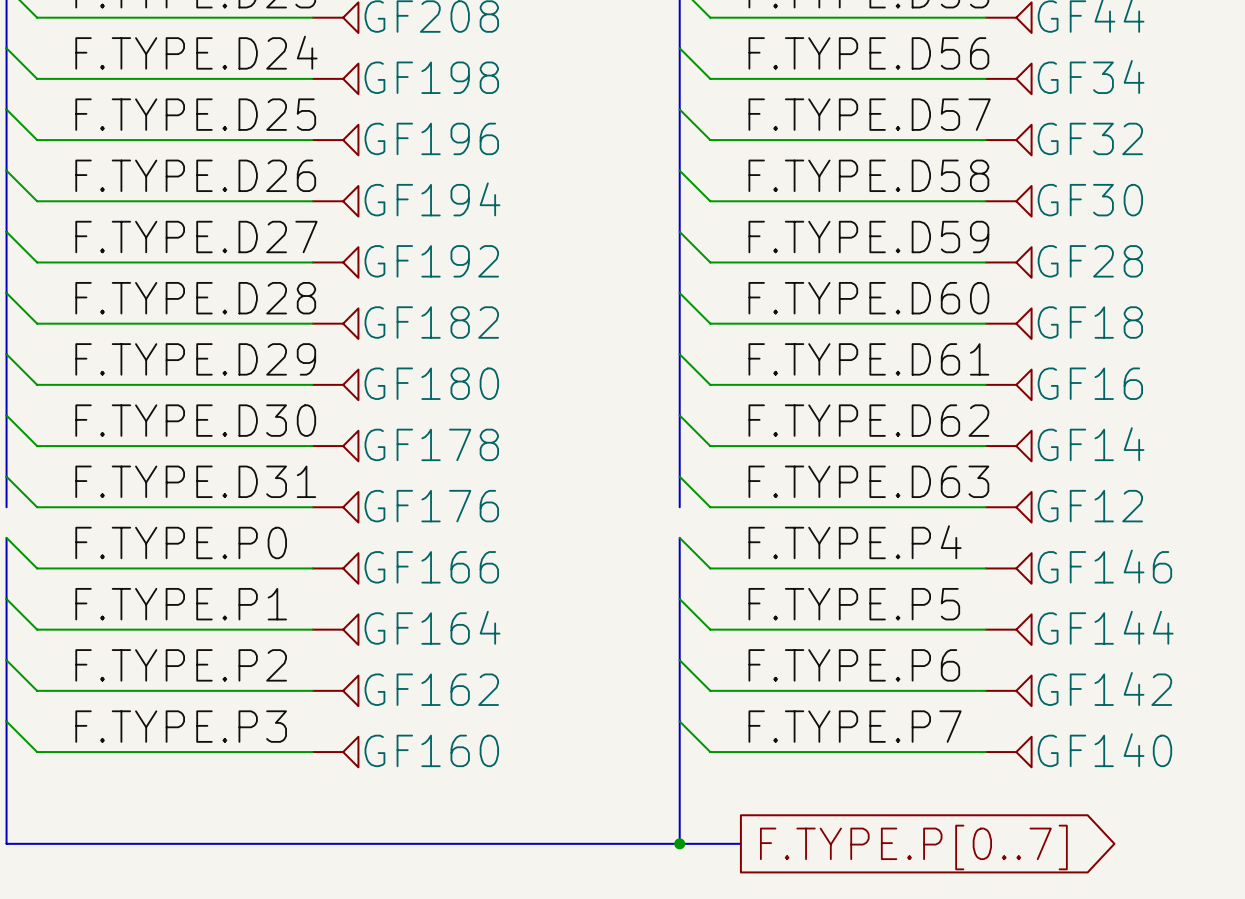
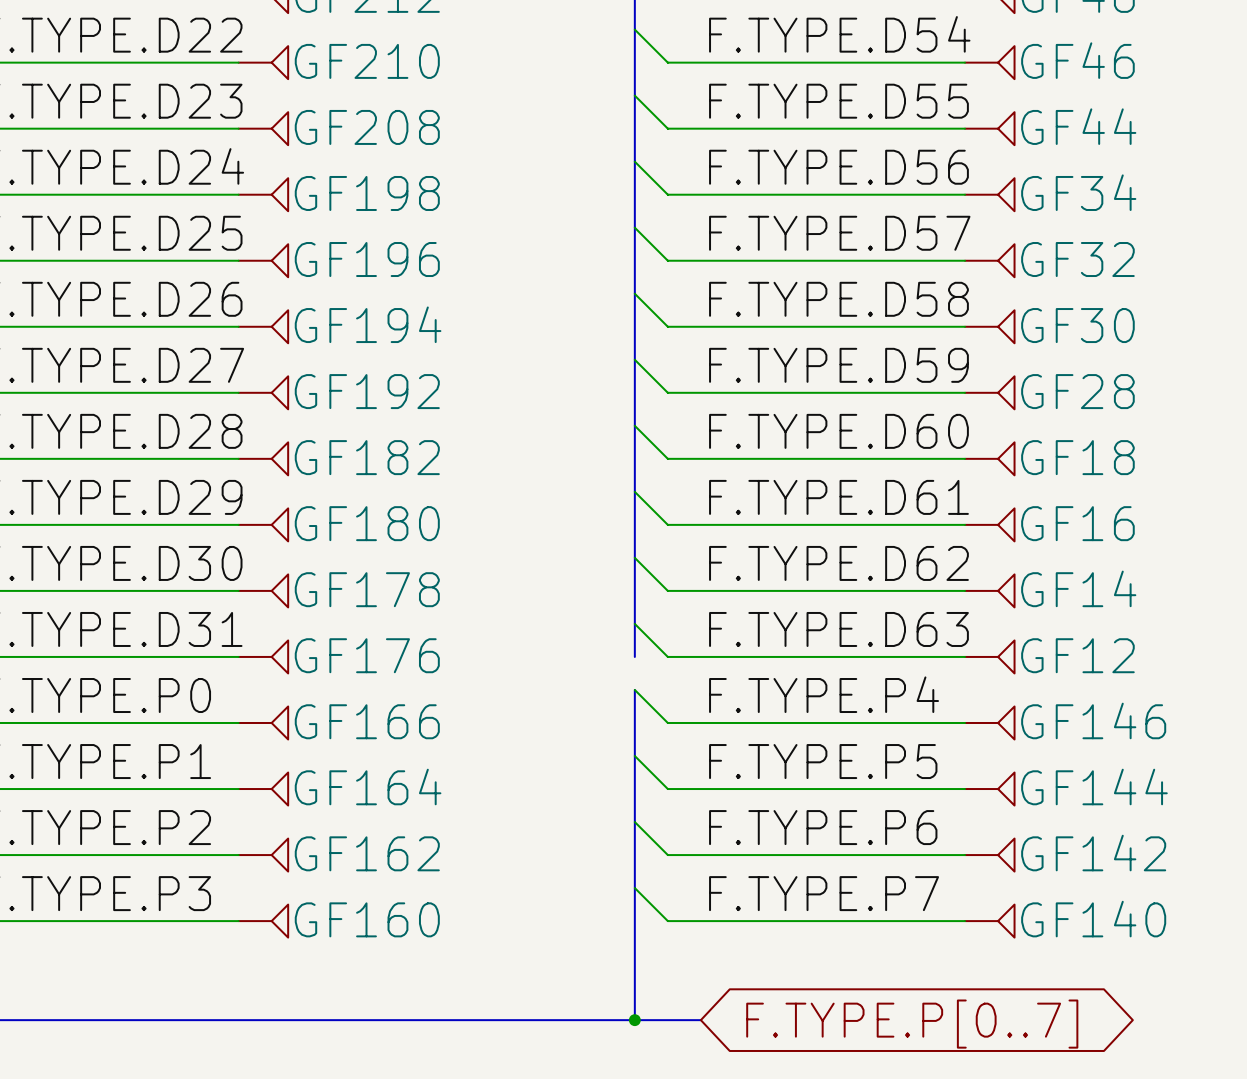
global label shape: output (913, 847) -> bidirectional (912, 1024)

